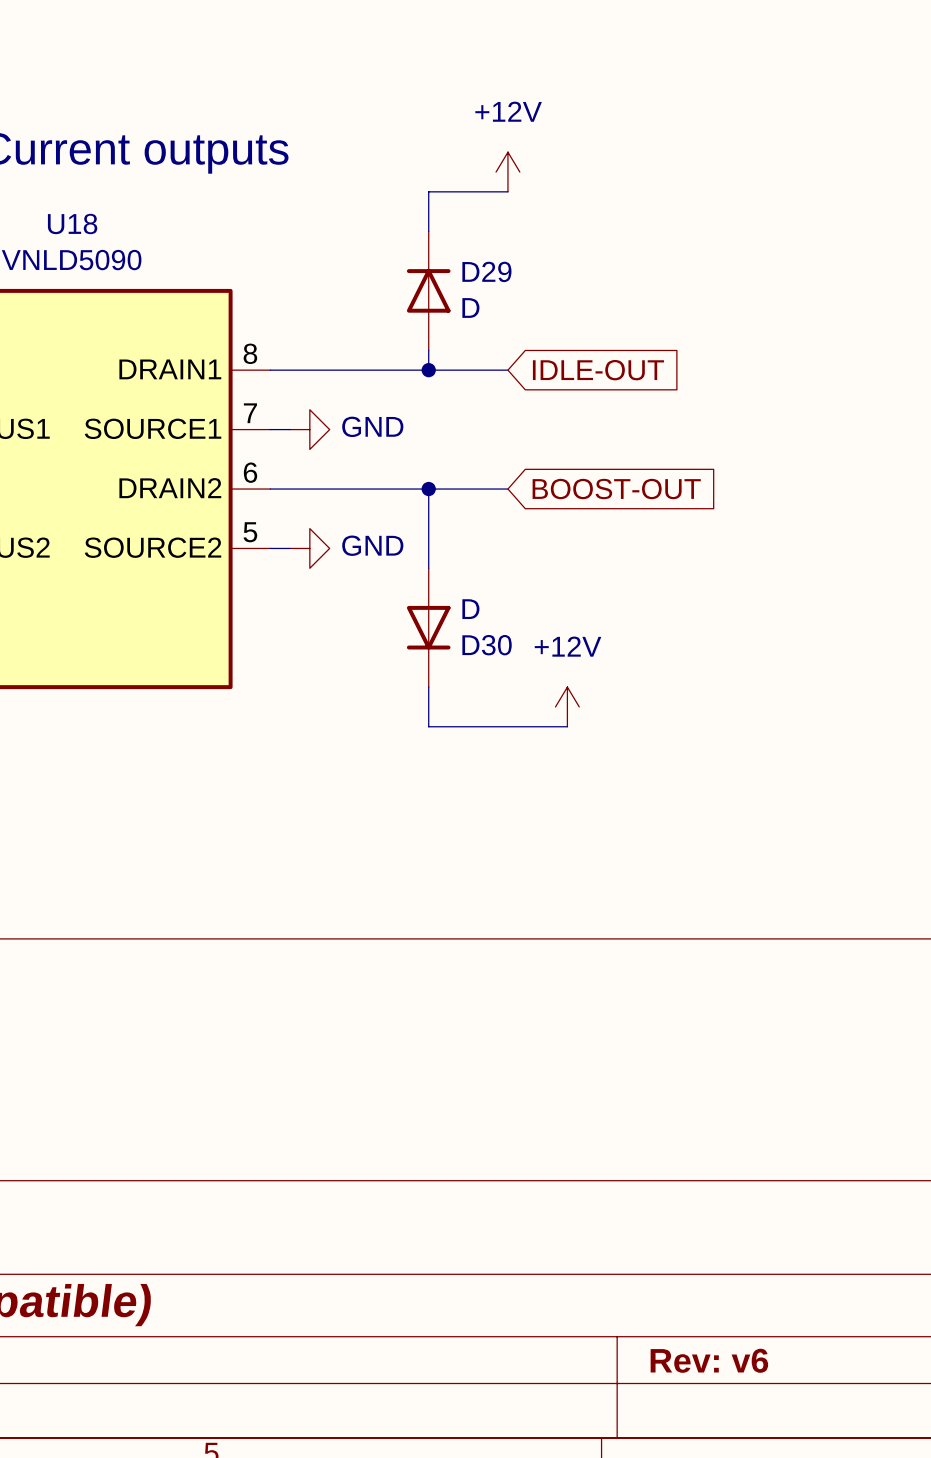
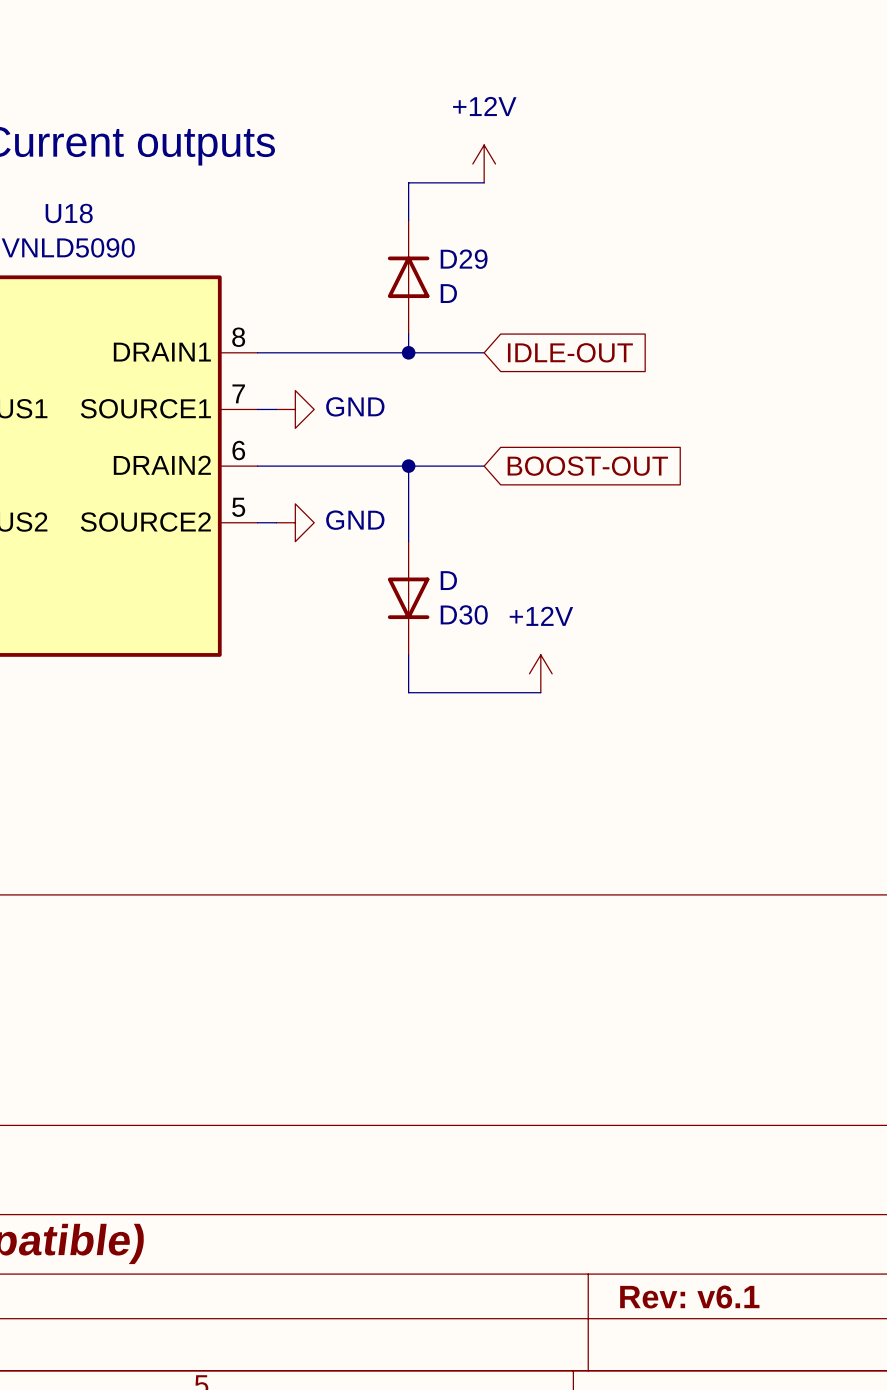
title block: Rev: v6 (709, 1360) -> Rev: v6.1 (689, 1297)

